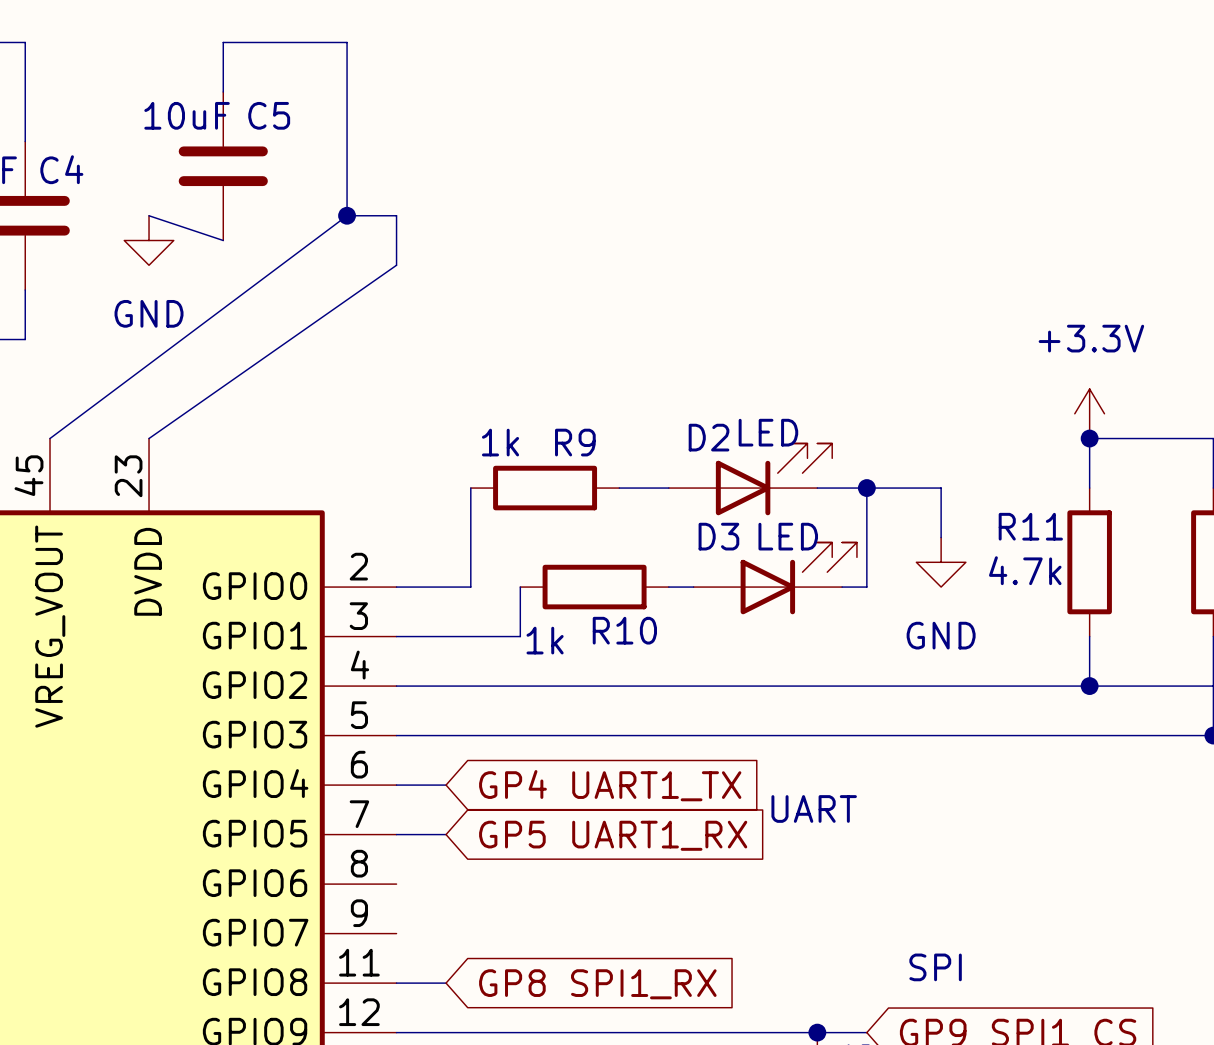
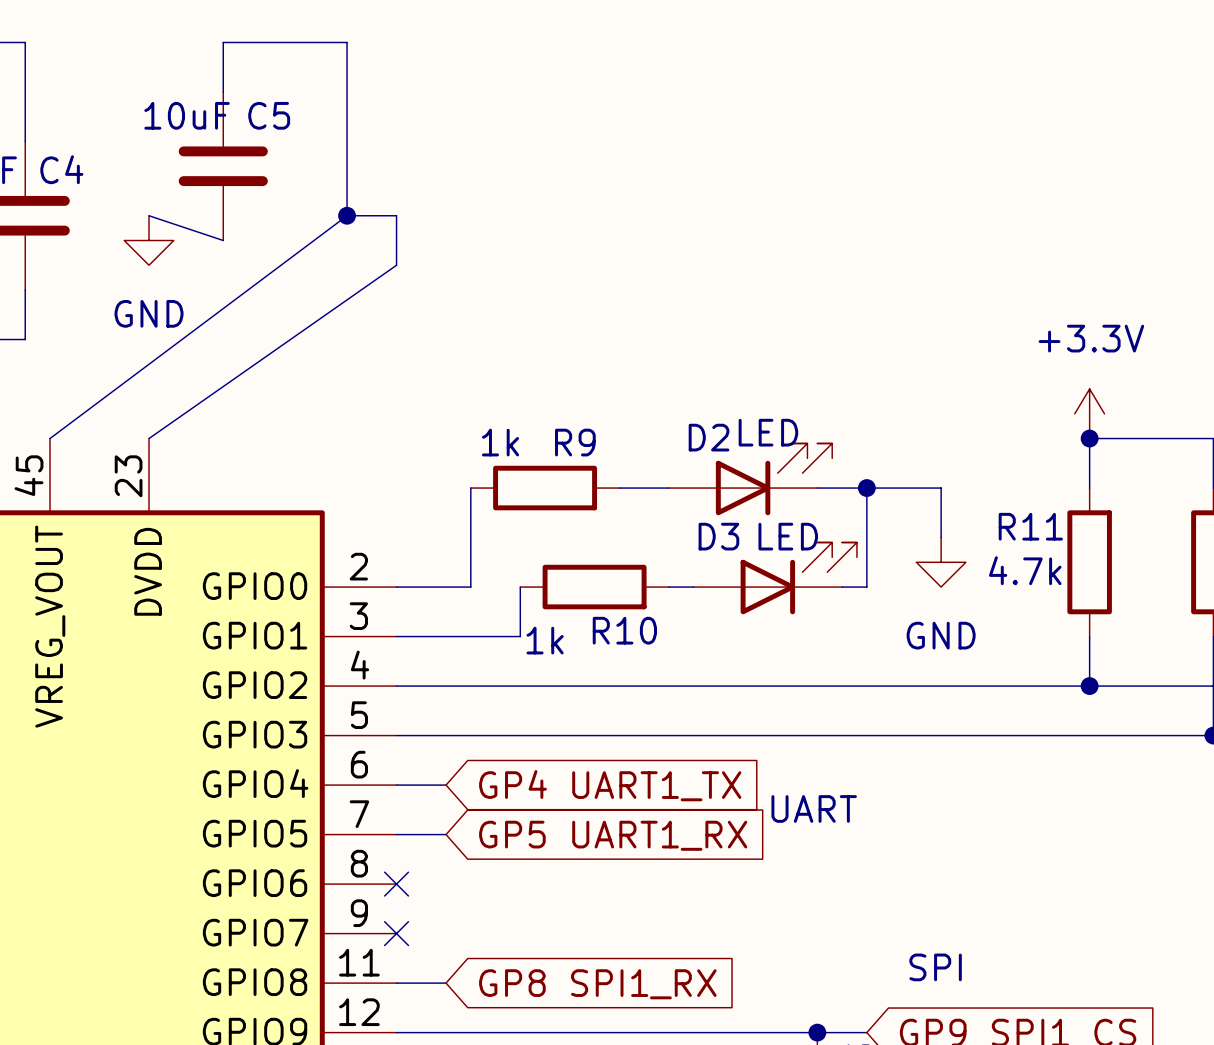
no-connect mark: none -> (396, 884)
no-connect mark: none -> (396, 933)

